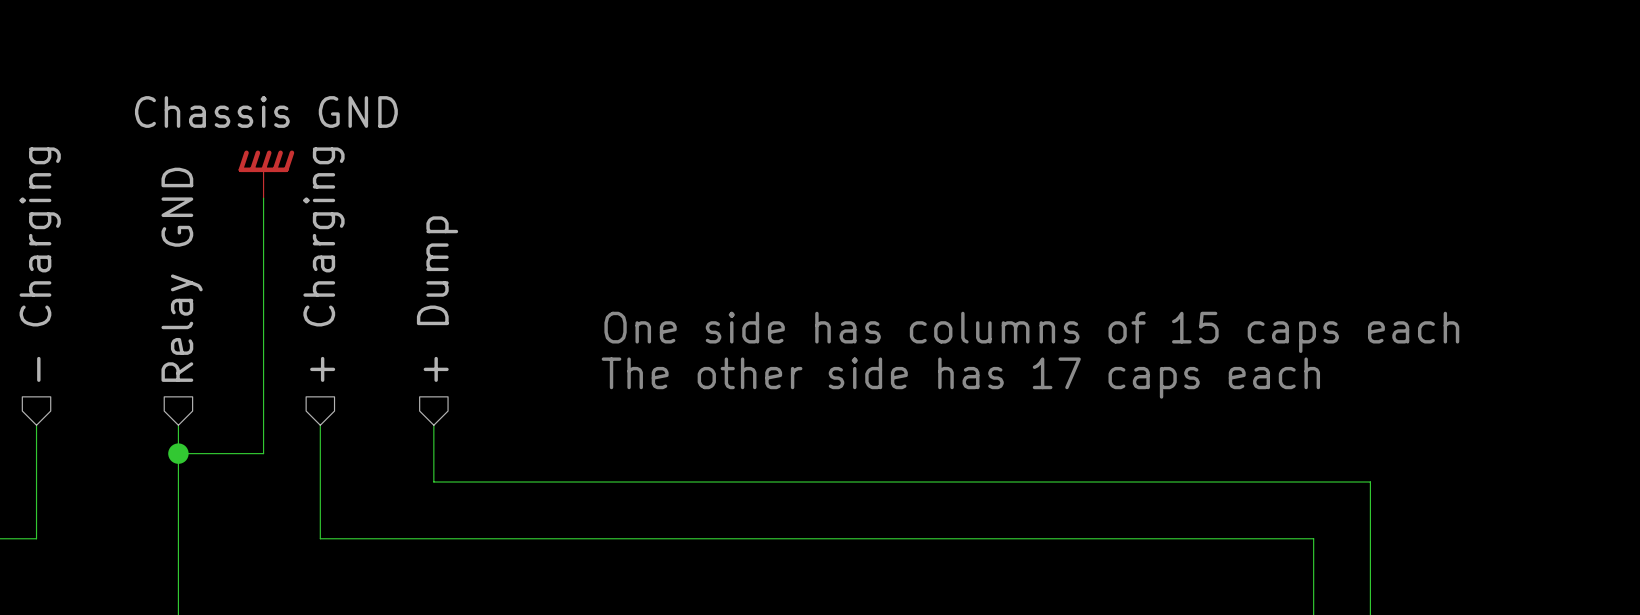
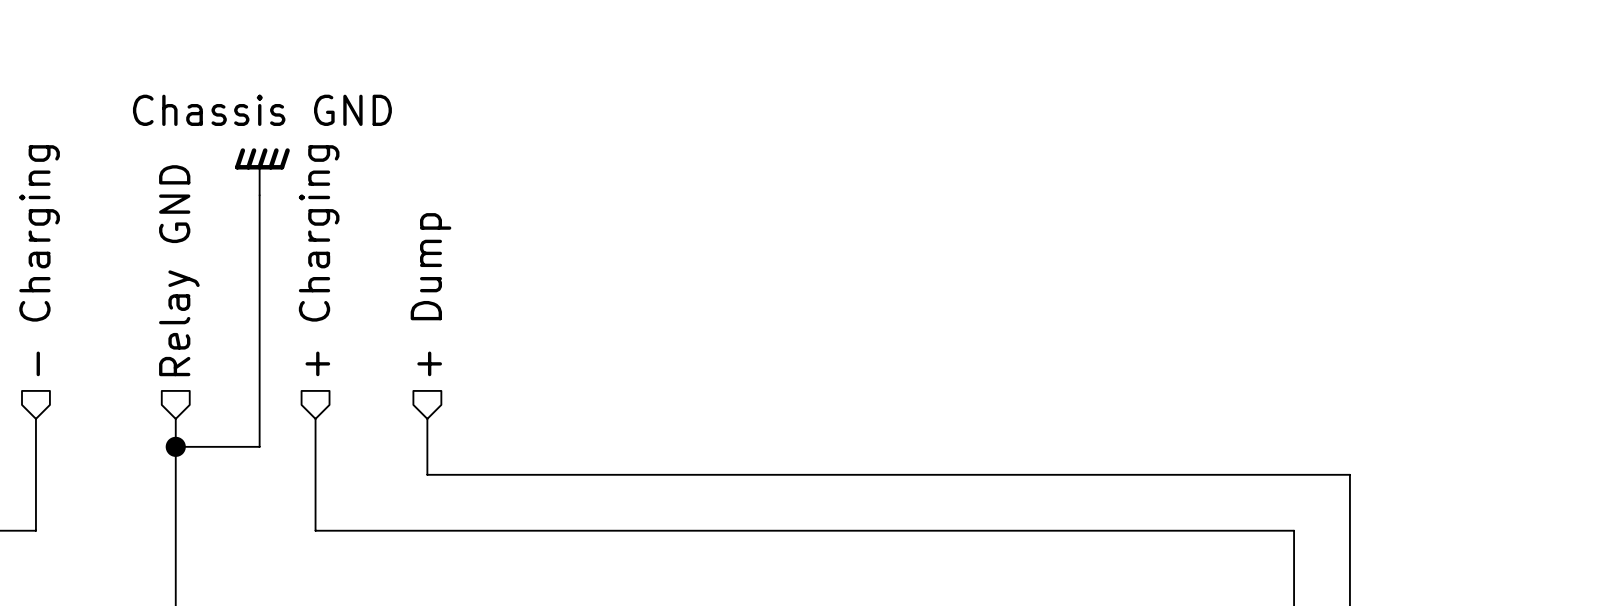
text: One side has columns of 15 caps each (1031, 332) -> none
text: The other side has 17 caps each (960, 378) -> none

